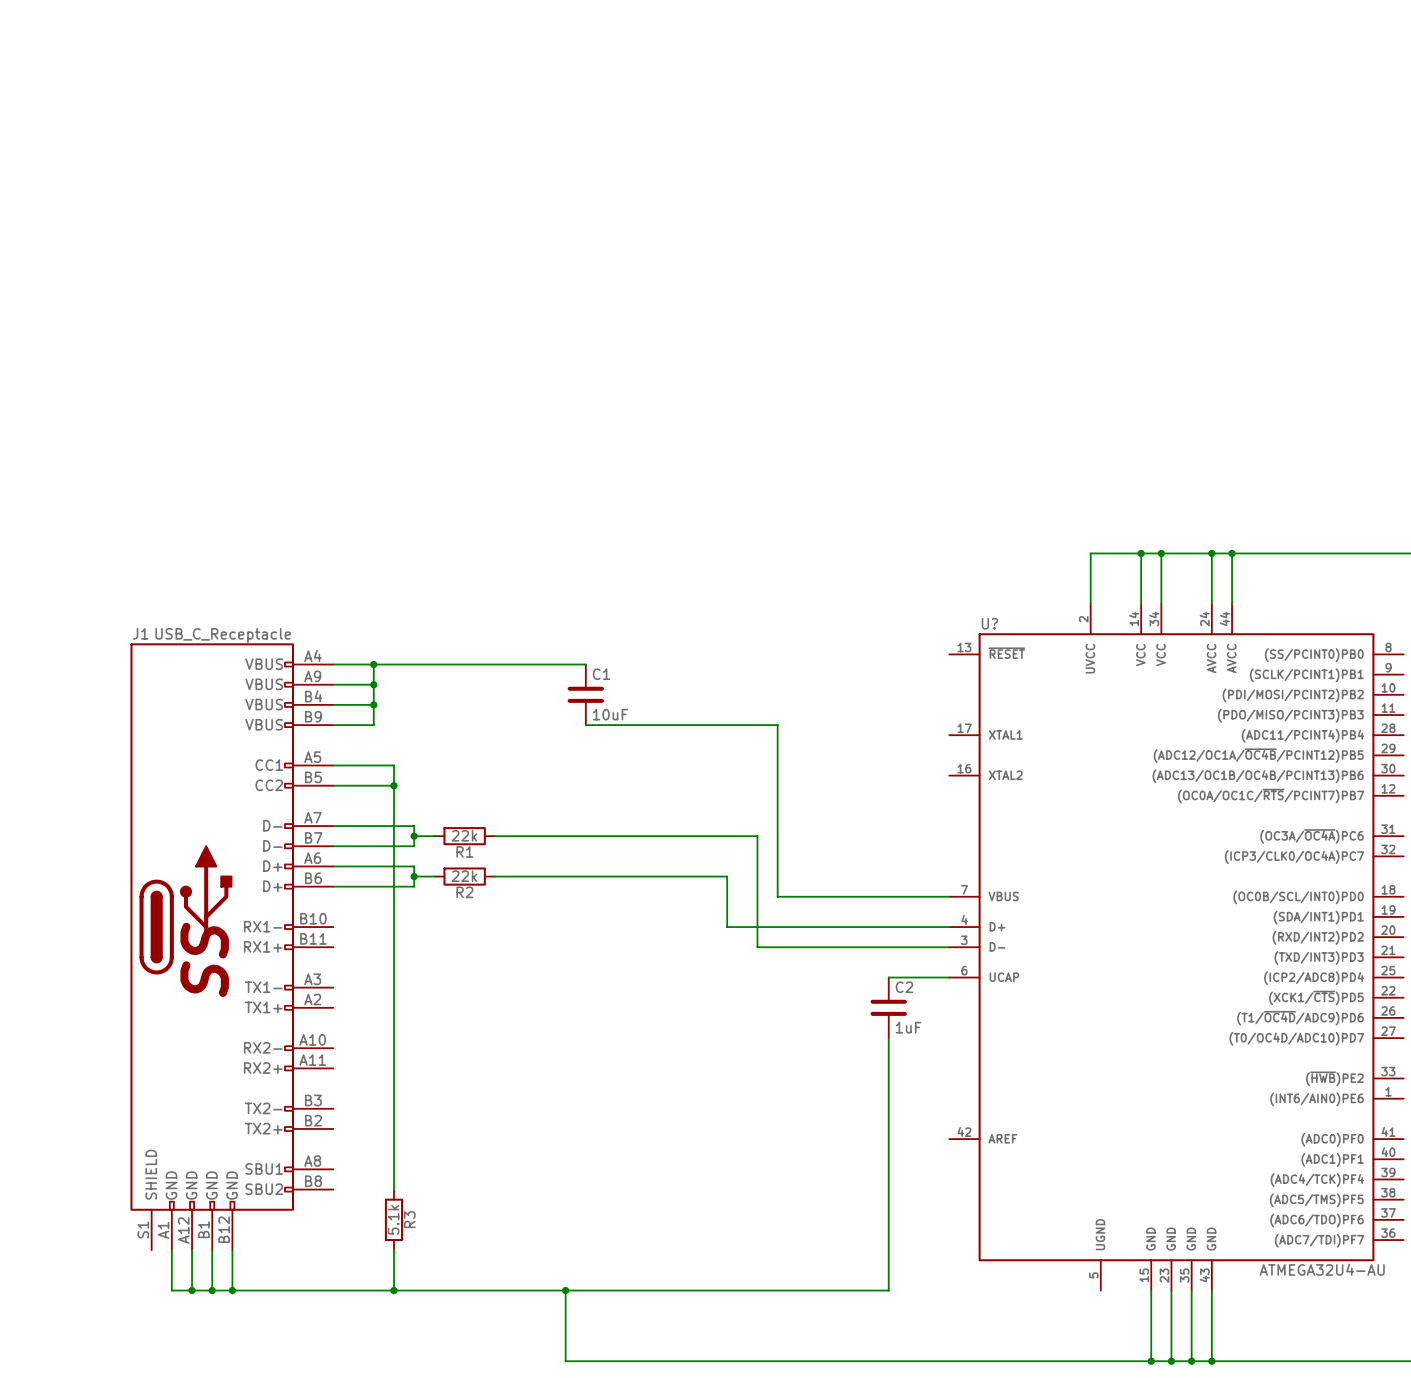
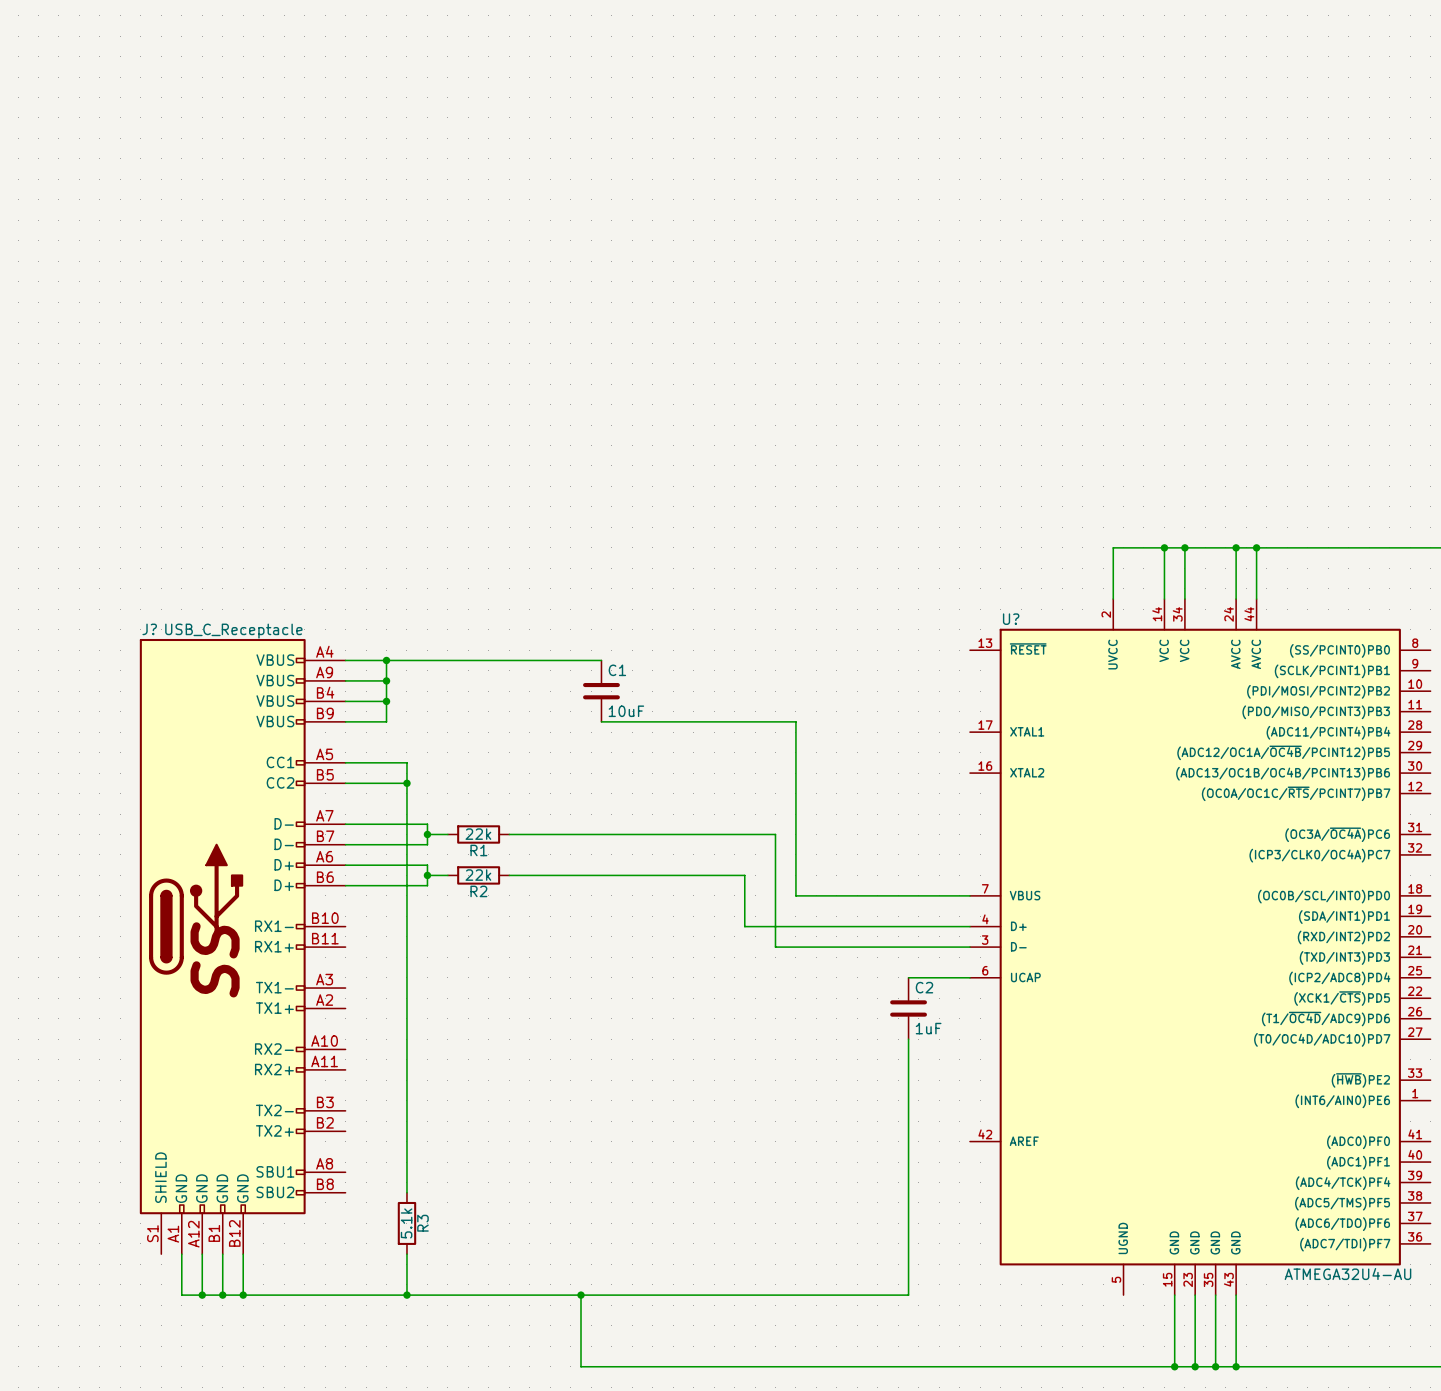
J1 name: J1 (140, 633) -> J? (149, 629)

